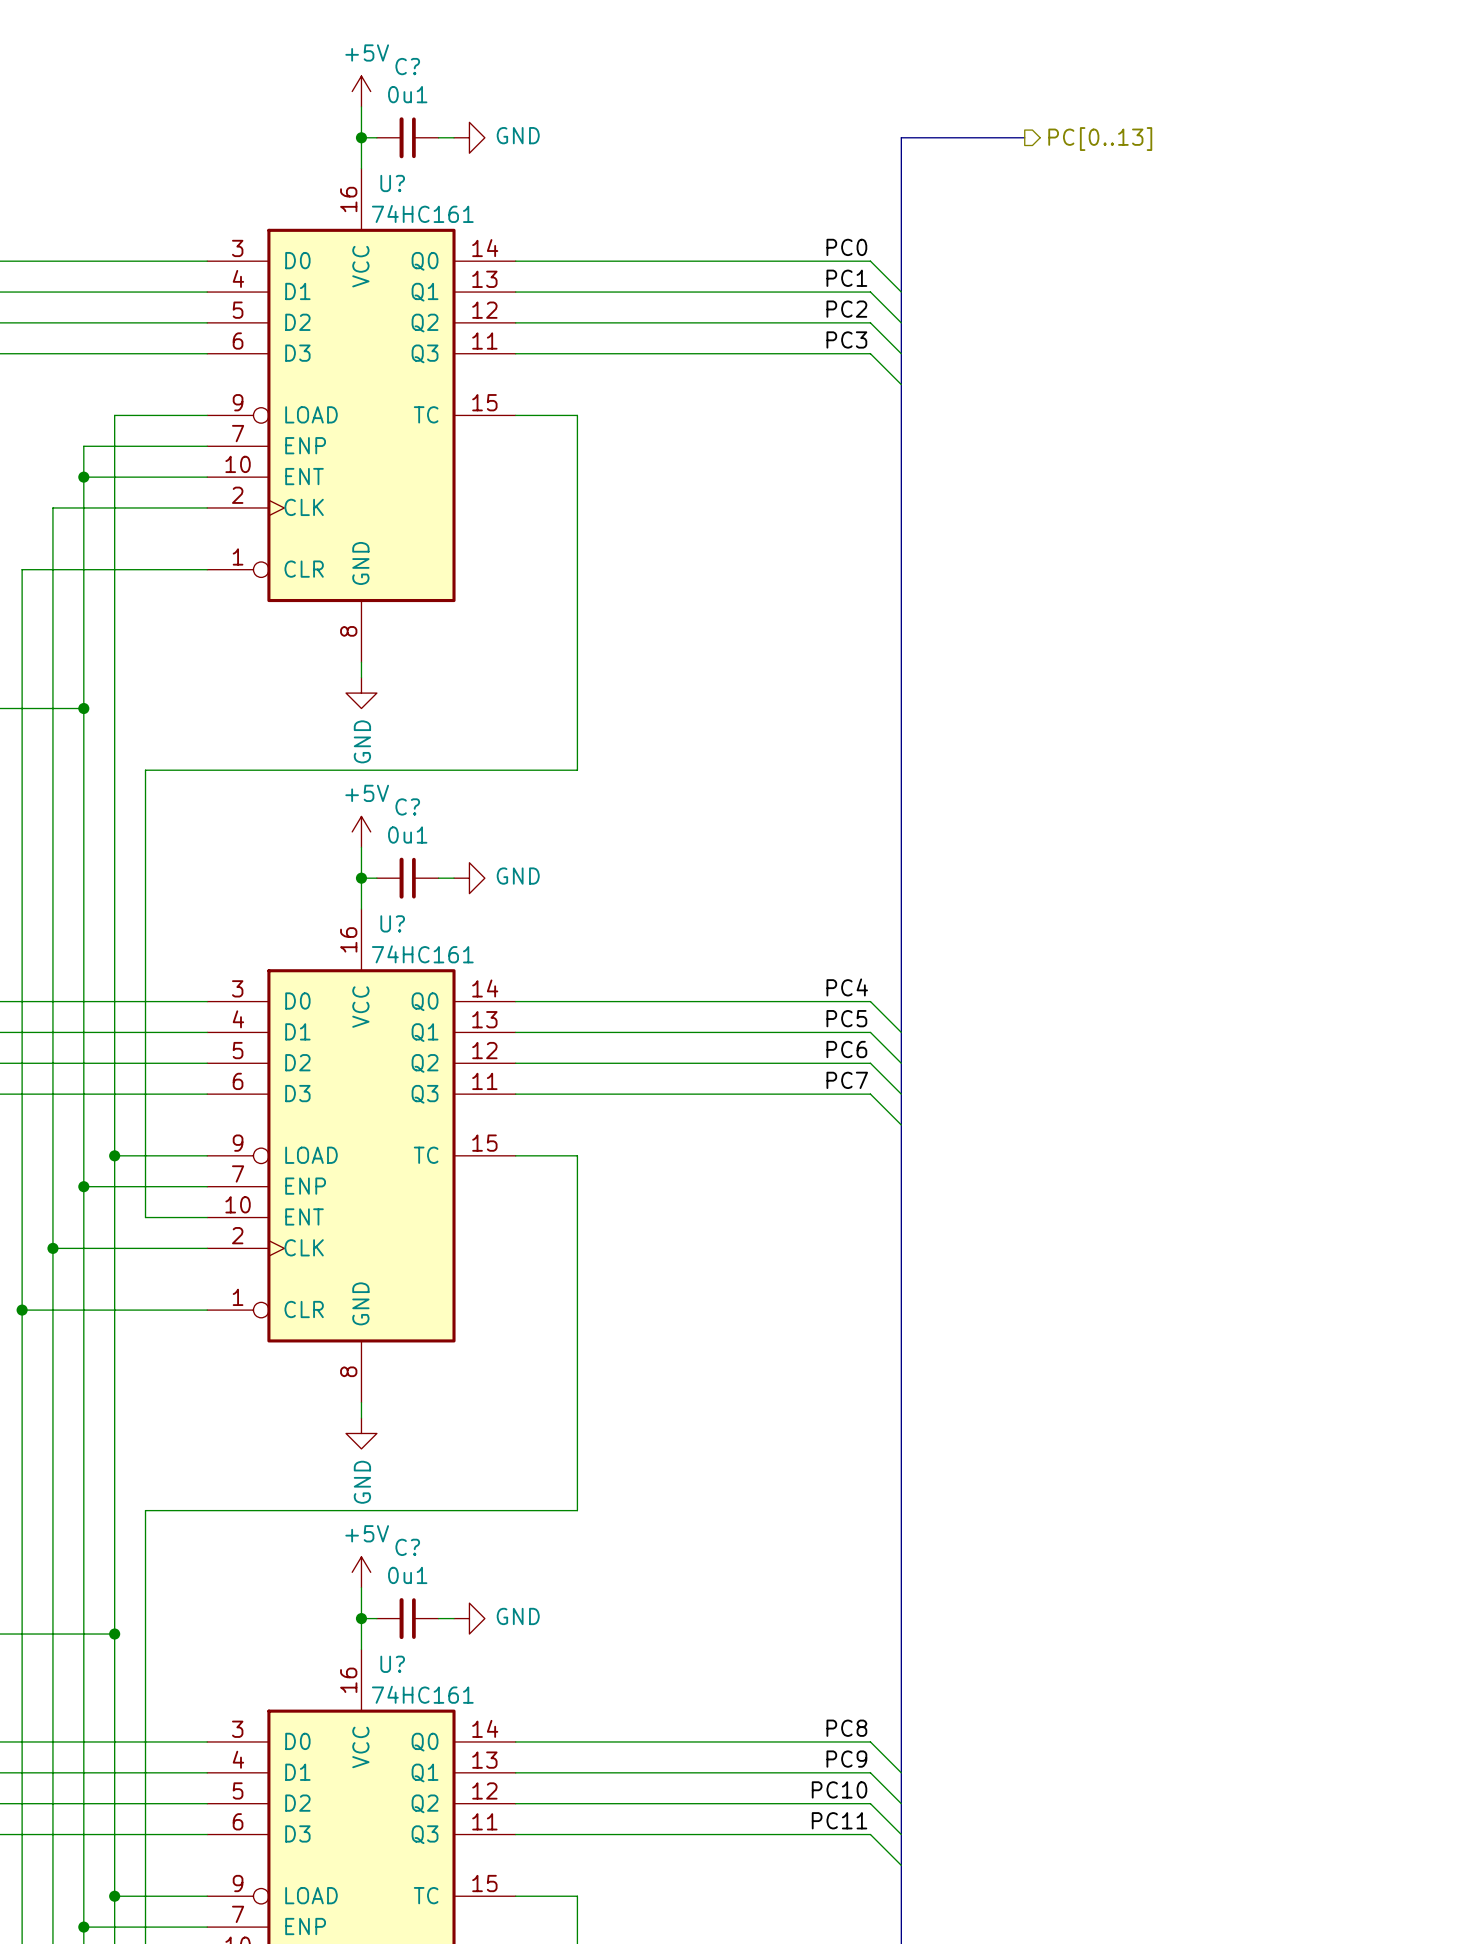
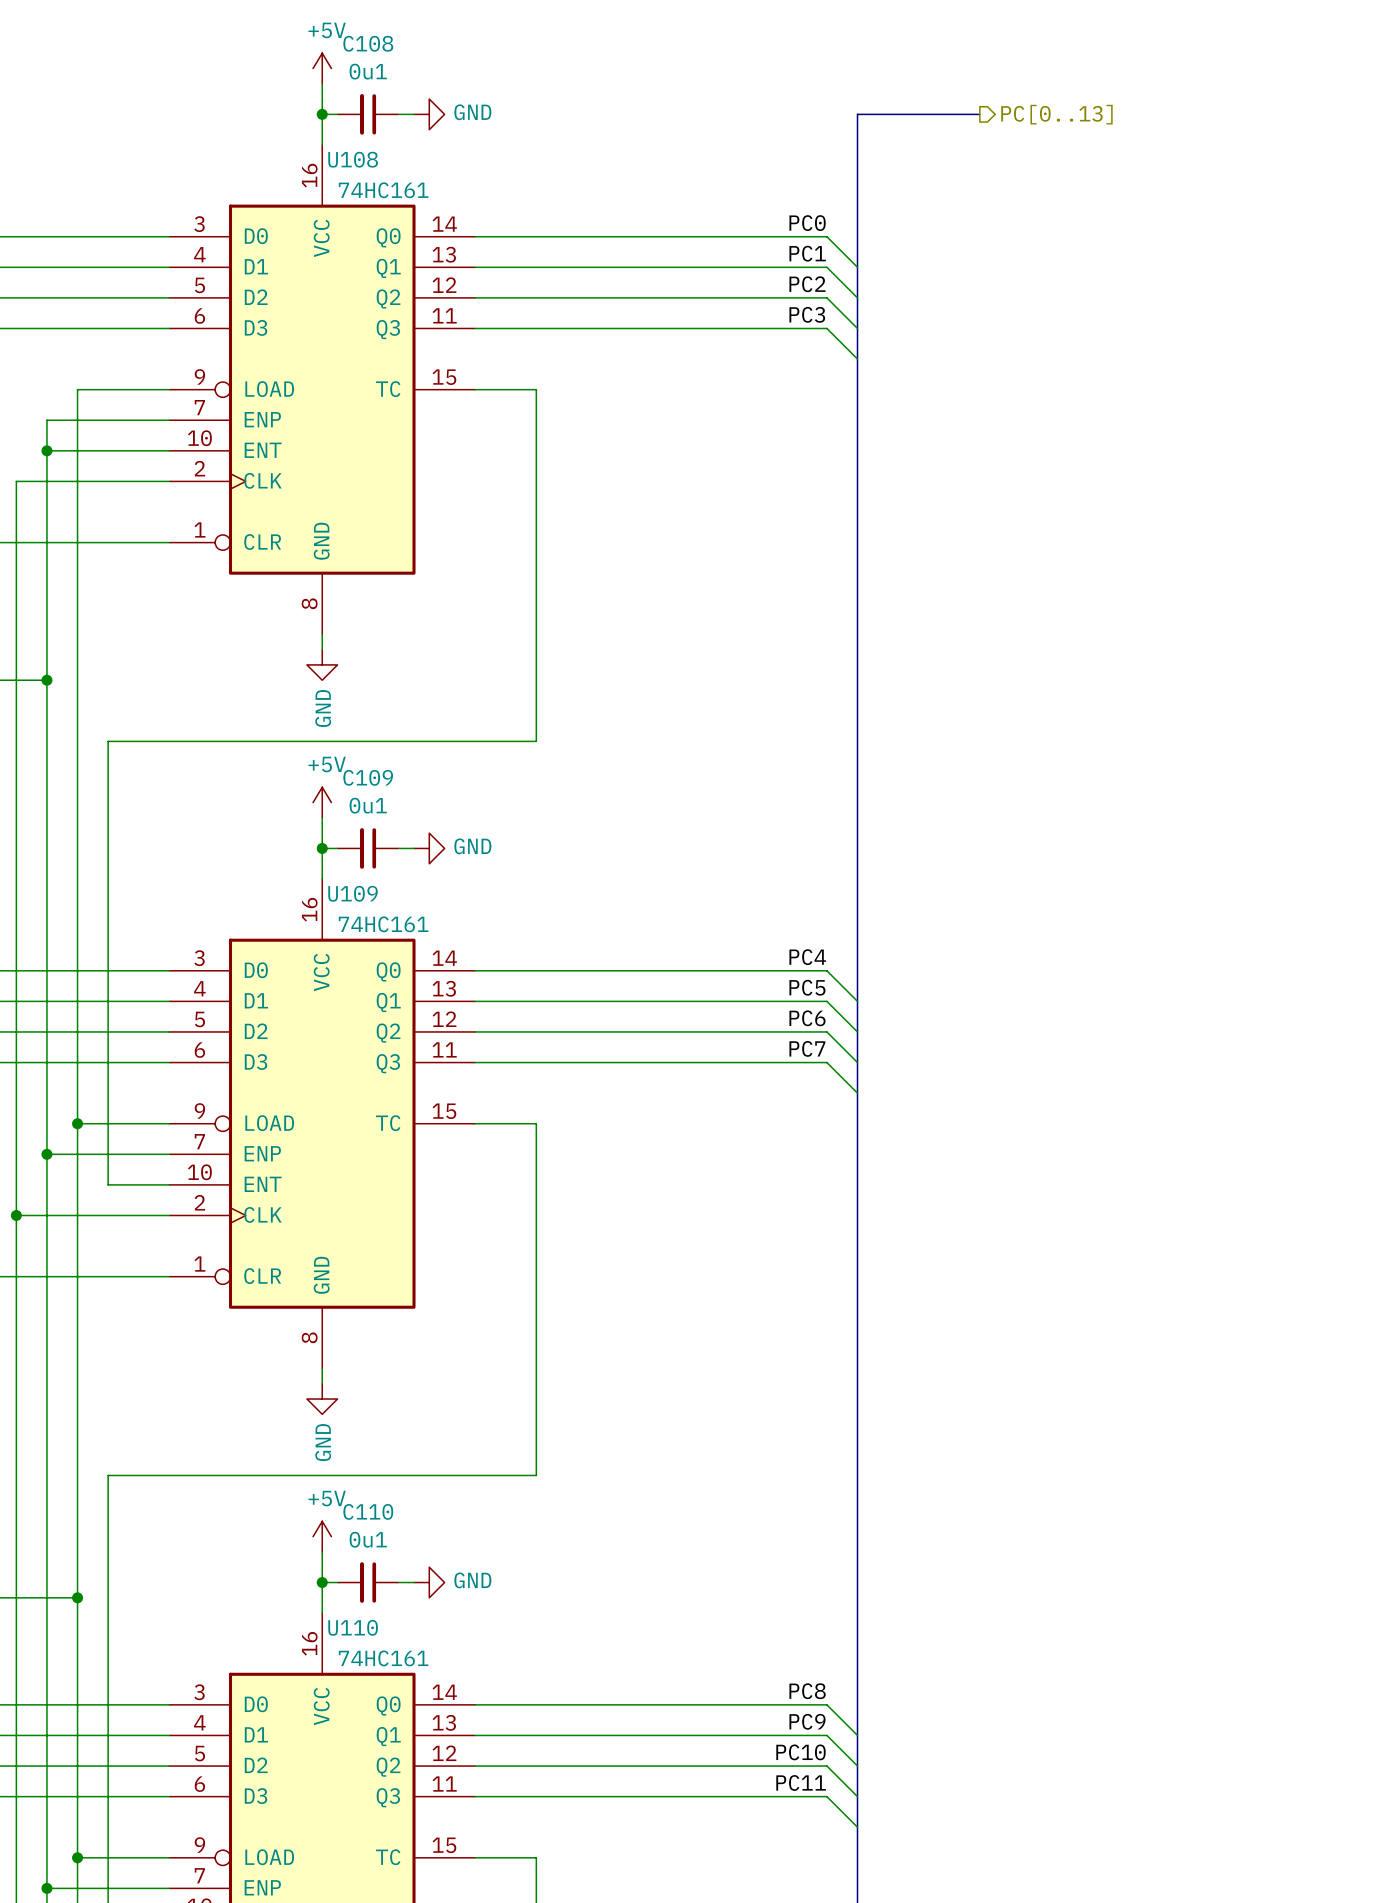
C? name: C? (407, 66) -> C108 (368, 43)
U? name: U? (392, 183) -> U108 (353, 159)
C? name: C? (407, 806) -> C109 (368, 777)
U? name: U? (392, 923) -> U109 (353, 893)
C? name: C? (407, 1547) -> C110 (368, 1511)
U? name: U? (392, 1664) -> U110 (353, 1627)

